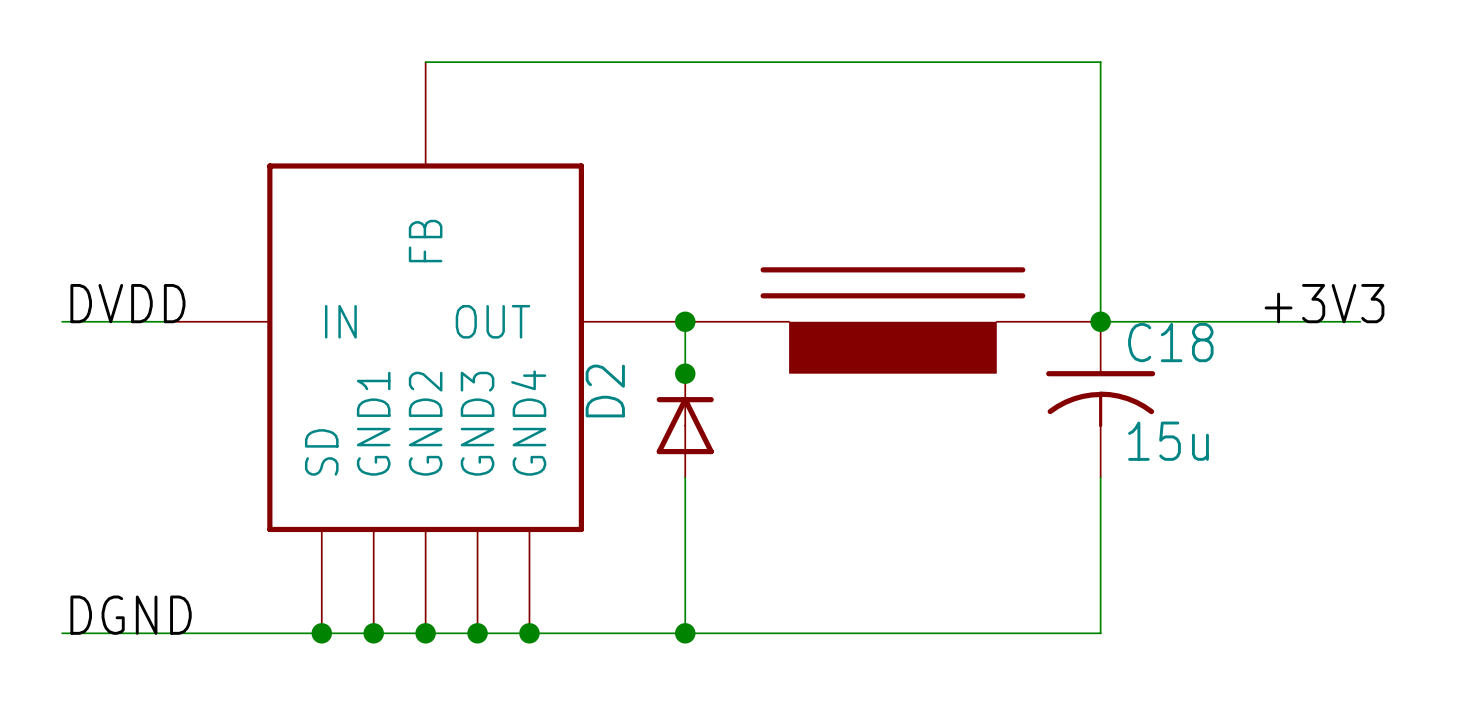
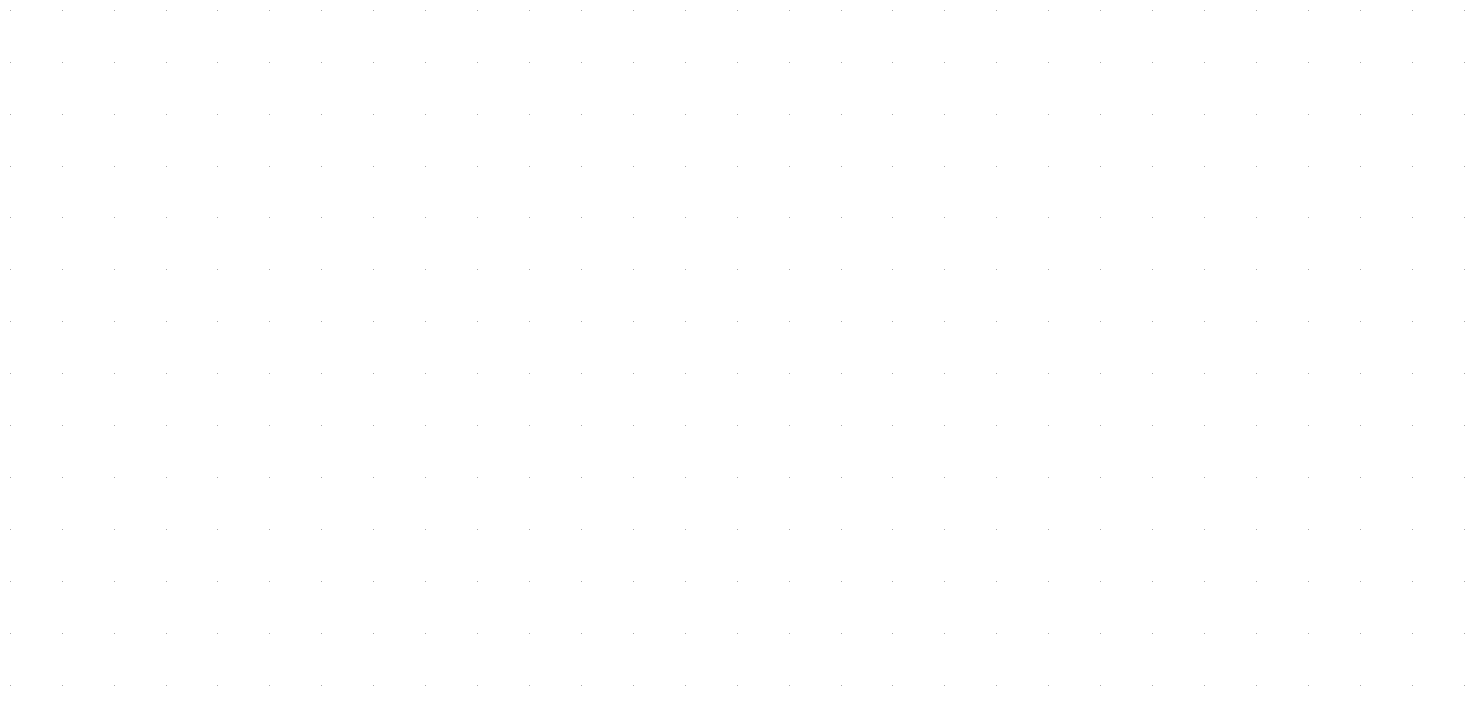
wire: (425, 62) (1100, 62) (1100, 321) (1360, 321) -> none
label: DVDD (127, 303) -> none
label: +3V3 (1324, 303) -> none
part: (892, 320) -> none
wire: (62, 321) (166, 321) -> none
wire: (685, 321) (685, 373) -> none
junction: (685, 321) -> none
junction: (1100, 321) -> none
part: (425, 347) -> none
junction: (685, 373) -> none
C18: 15u (1100, 399) -> none
D2: (685, 425) -> none
wire: (685, 477) (685, 633) -> none
wire: (1100, 477) (1100, 633) (62, 633) -> none
label: DGND (131, 615) -> none
junction: (321, 633) -> none
junction: (373, 633) -> none
junction: (425, 633) -> none
junction: (477, 633) -> none
junction: (529, 633) -> none
junction: (685, 633) -> none

